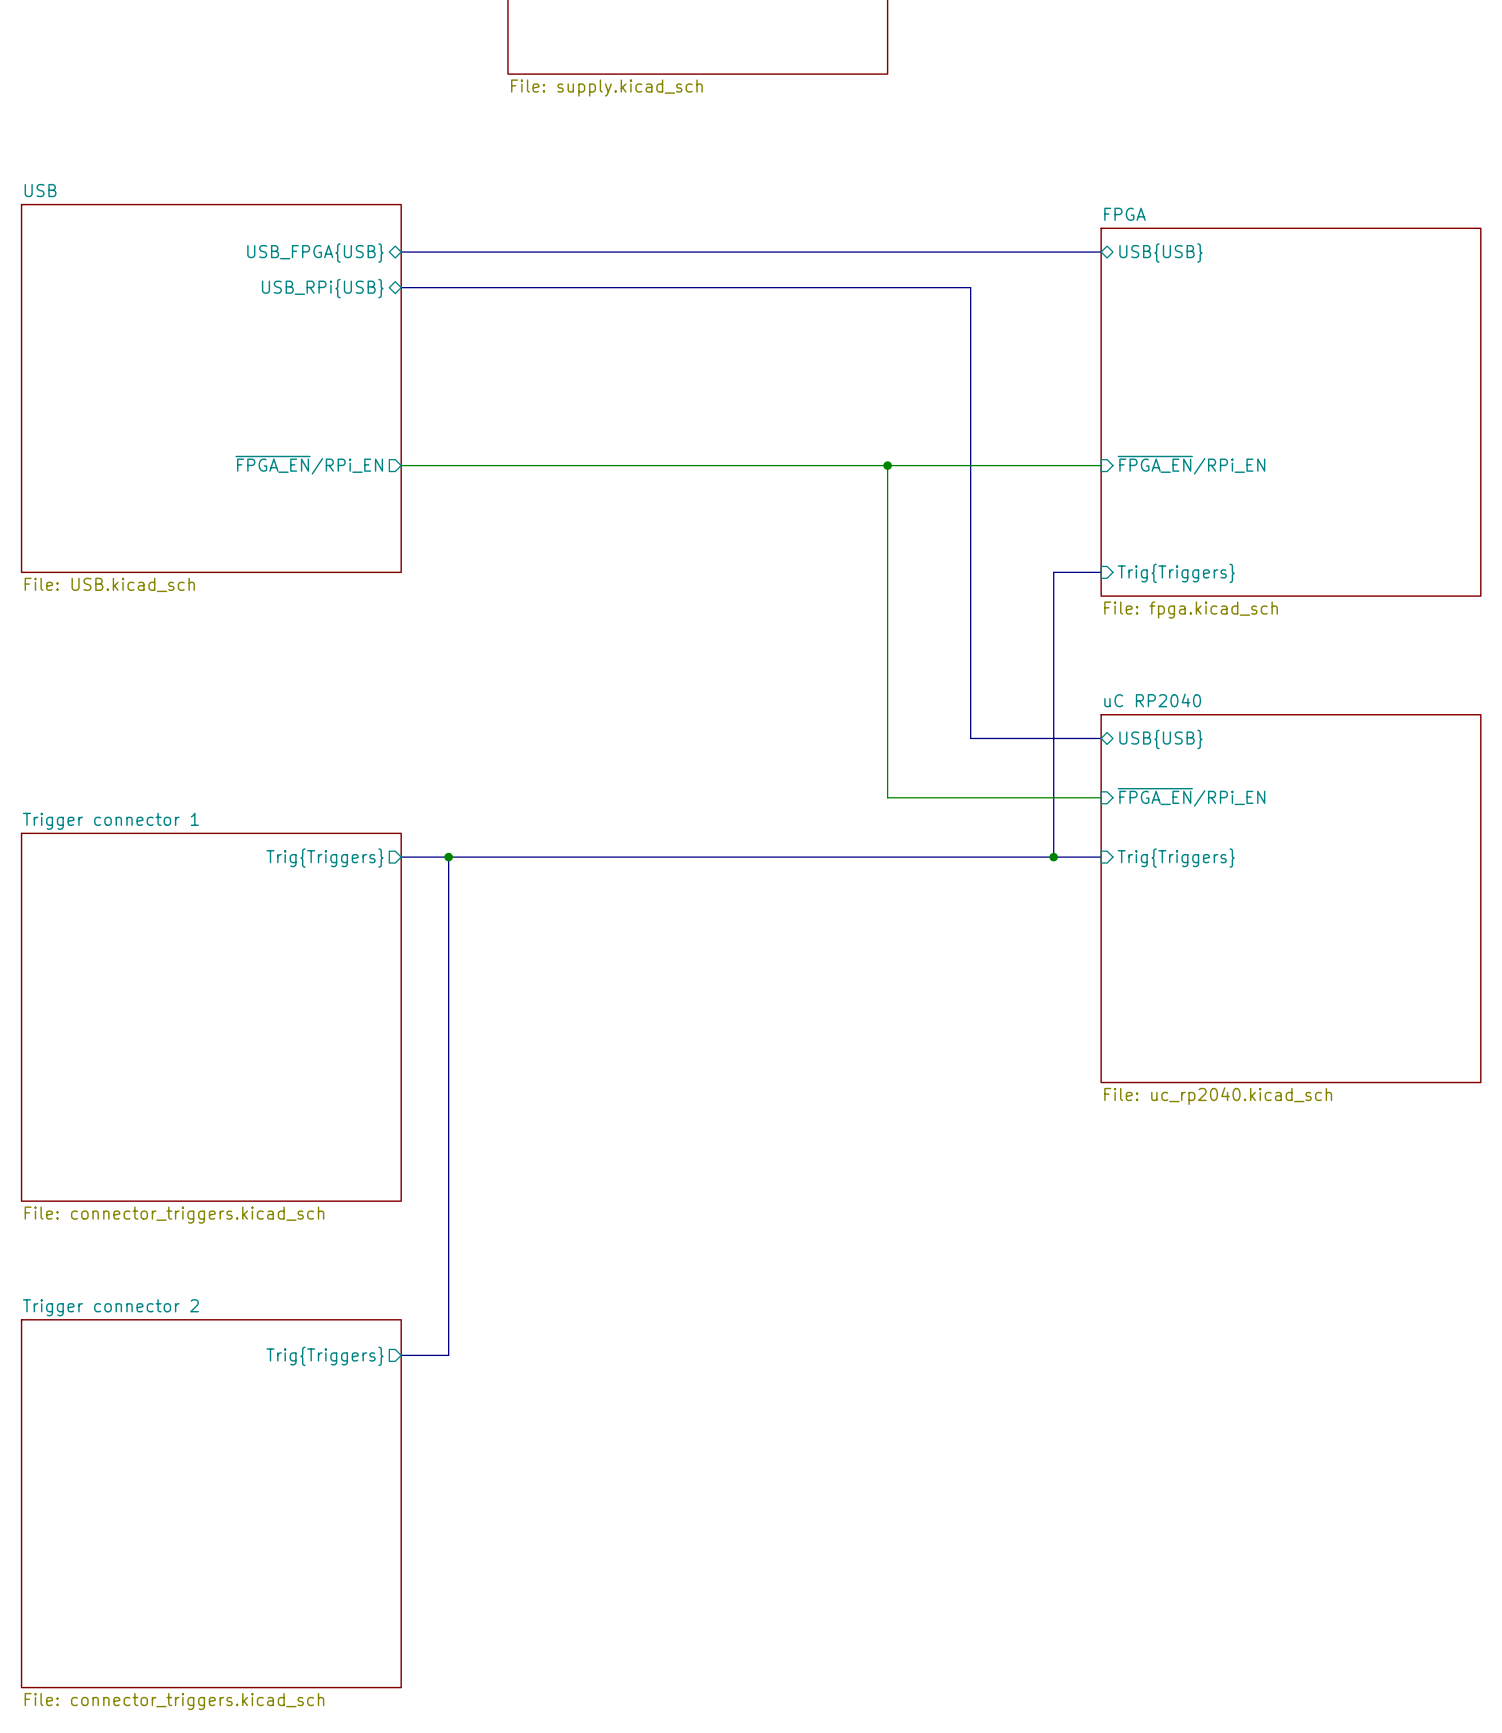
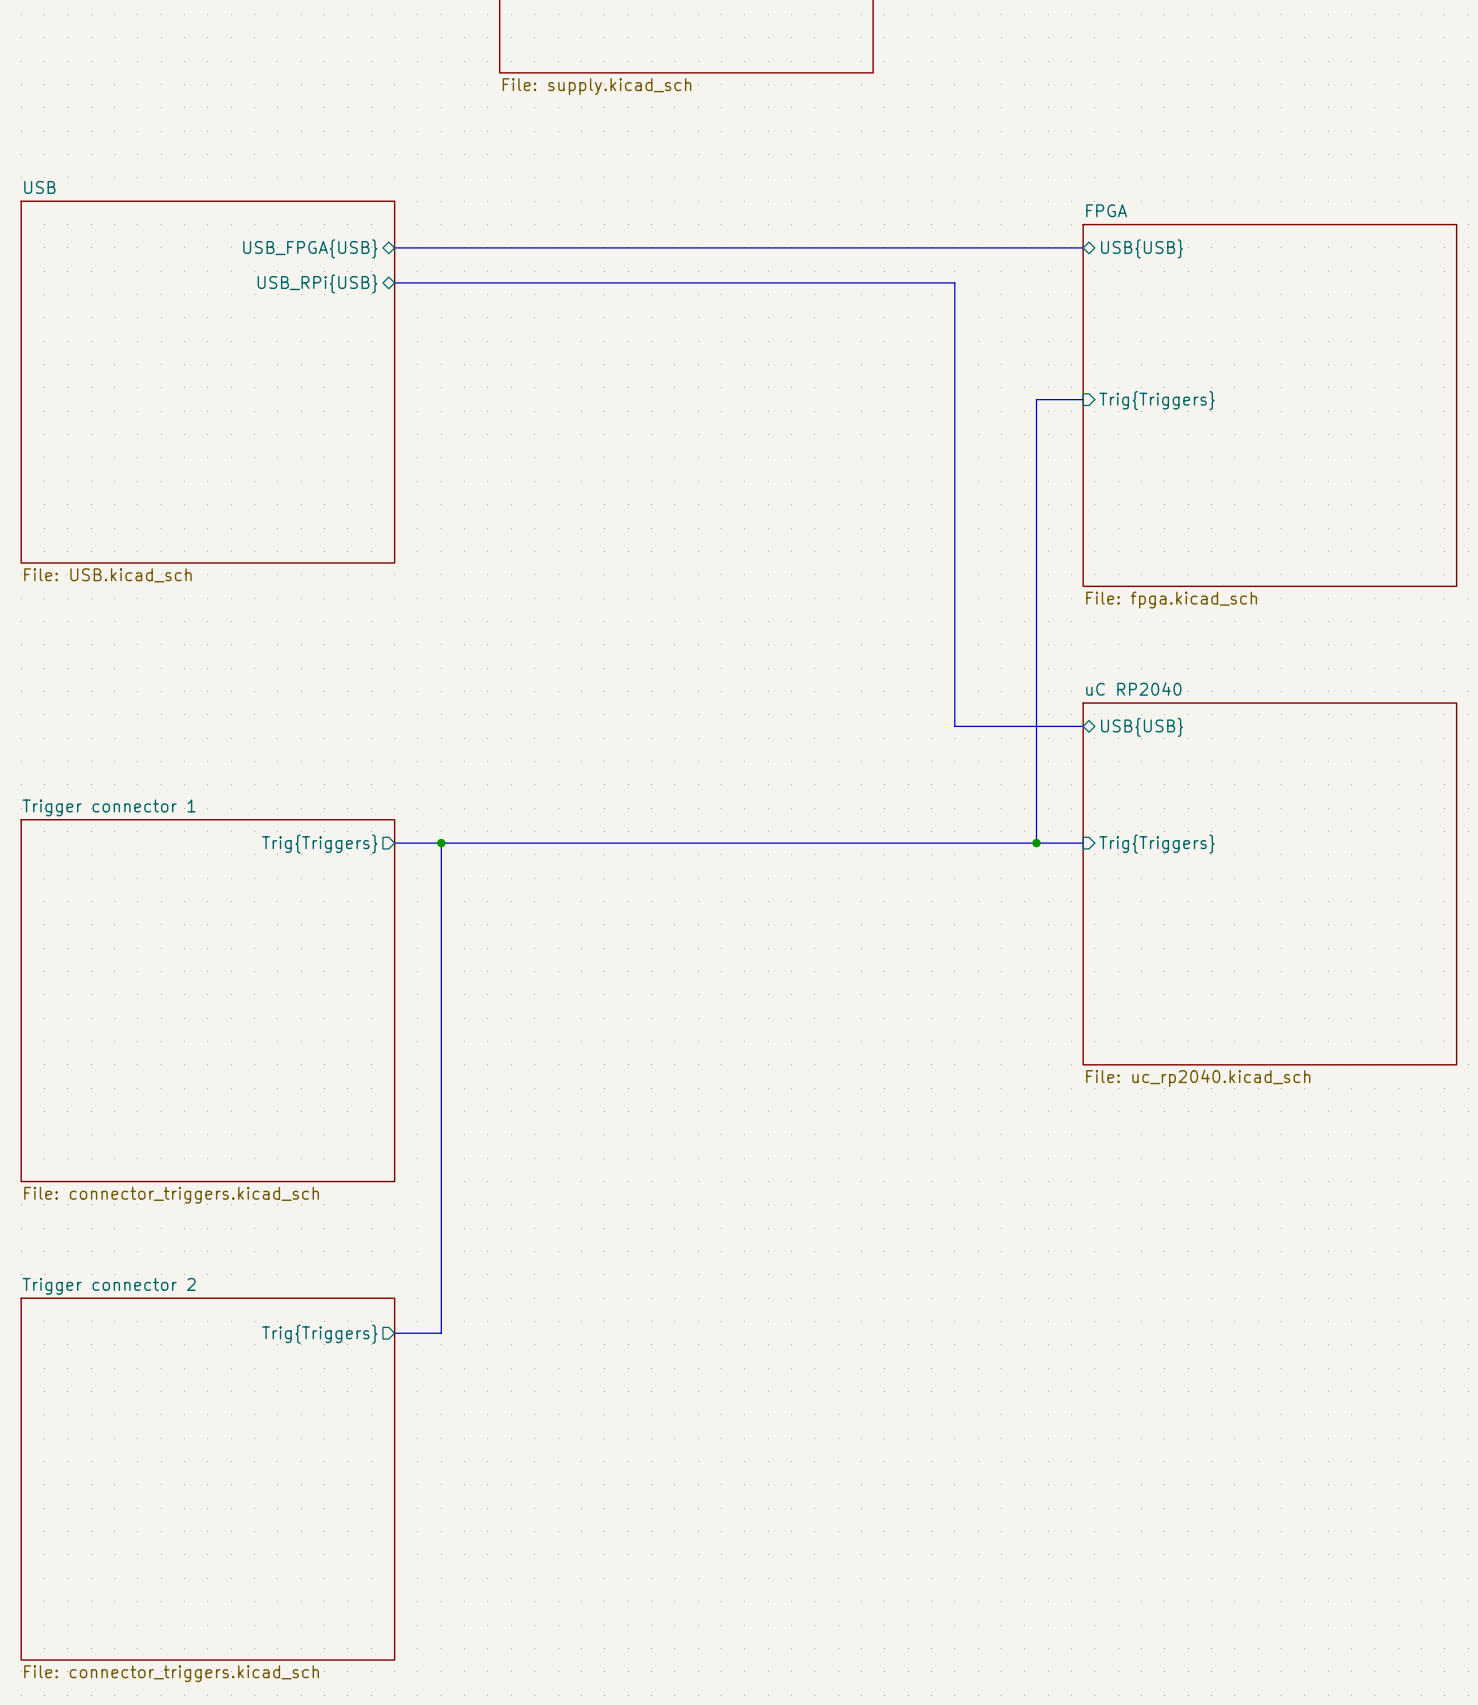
sheet pin: ~{FPGA_EN}/RPi_EN (309, 465) -> none
wire: (401, 465) (1101, 465) -> none
wire: (887, 465) (887, 797) (1101, 797) -> none
junction: (887, 465) -> none
sheet pin: ~{FPGA_EN}/RPi_EN (1191, 465) -> none
bus: (1053, 572) (1101, 572) -> (1036, 563) (1036, 399) (1083, 399)
sheet pin position: Trig{Triggers} (1176, 573) -> Trig{Triggers} (1156, 400)
sheet pin: ~{FPGA_EN}/RPi_EN (1191, 797) -> none

